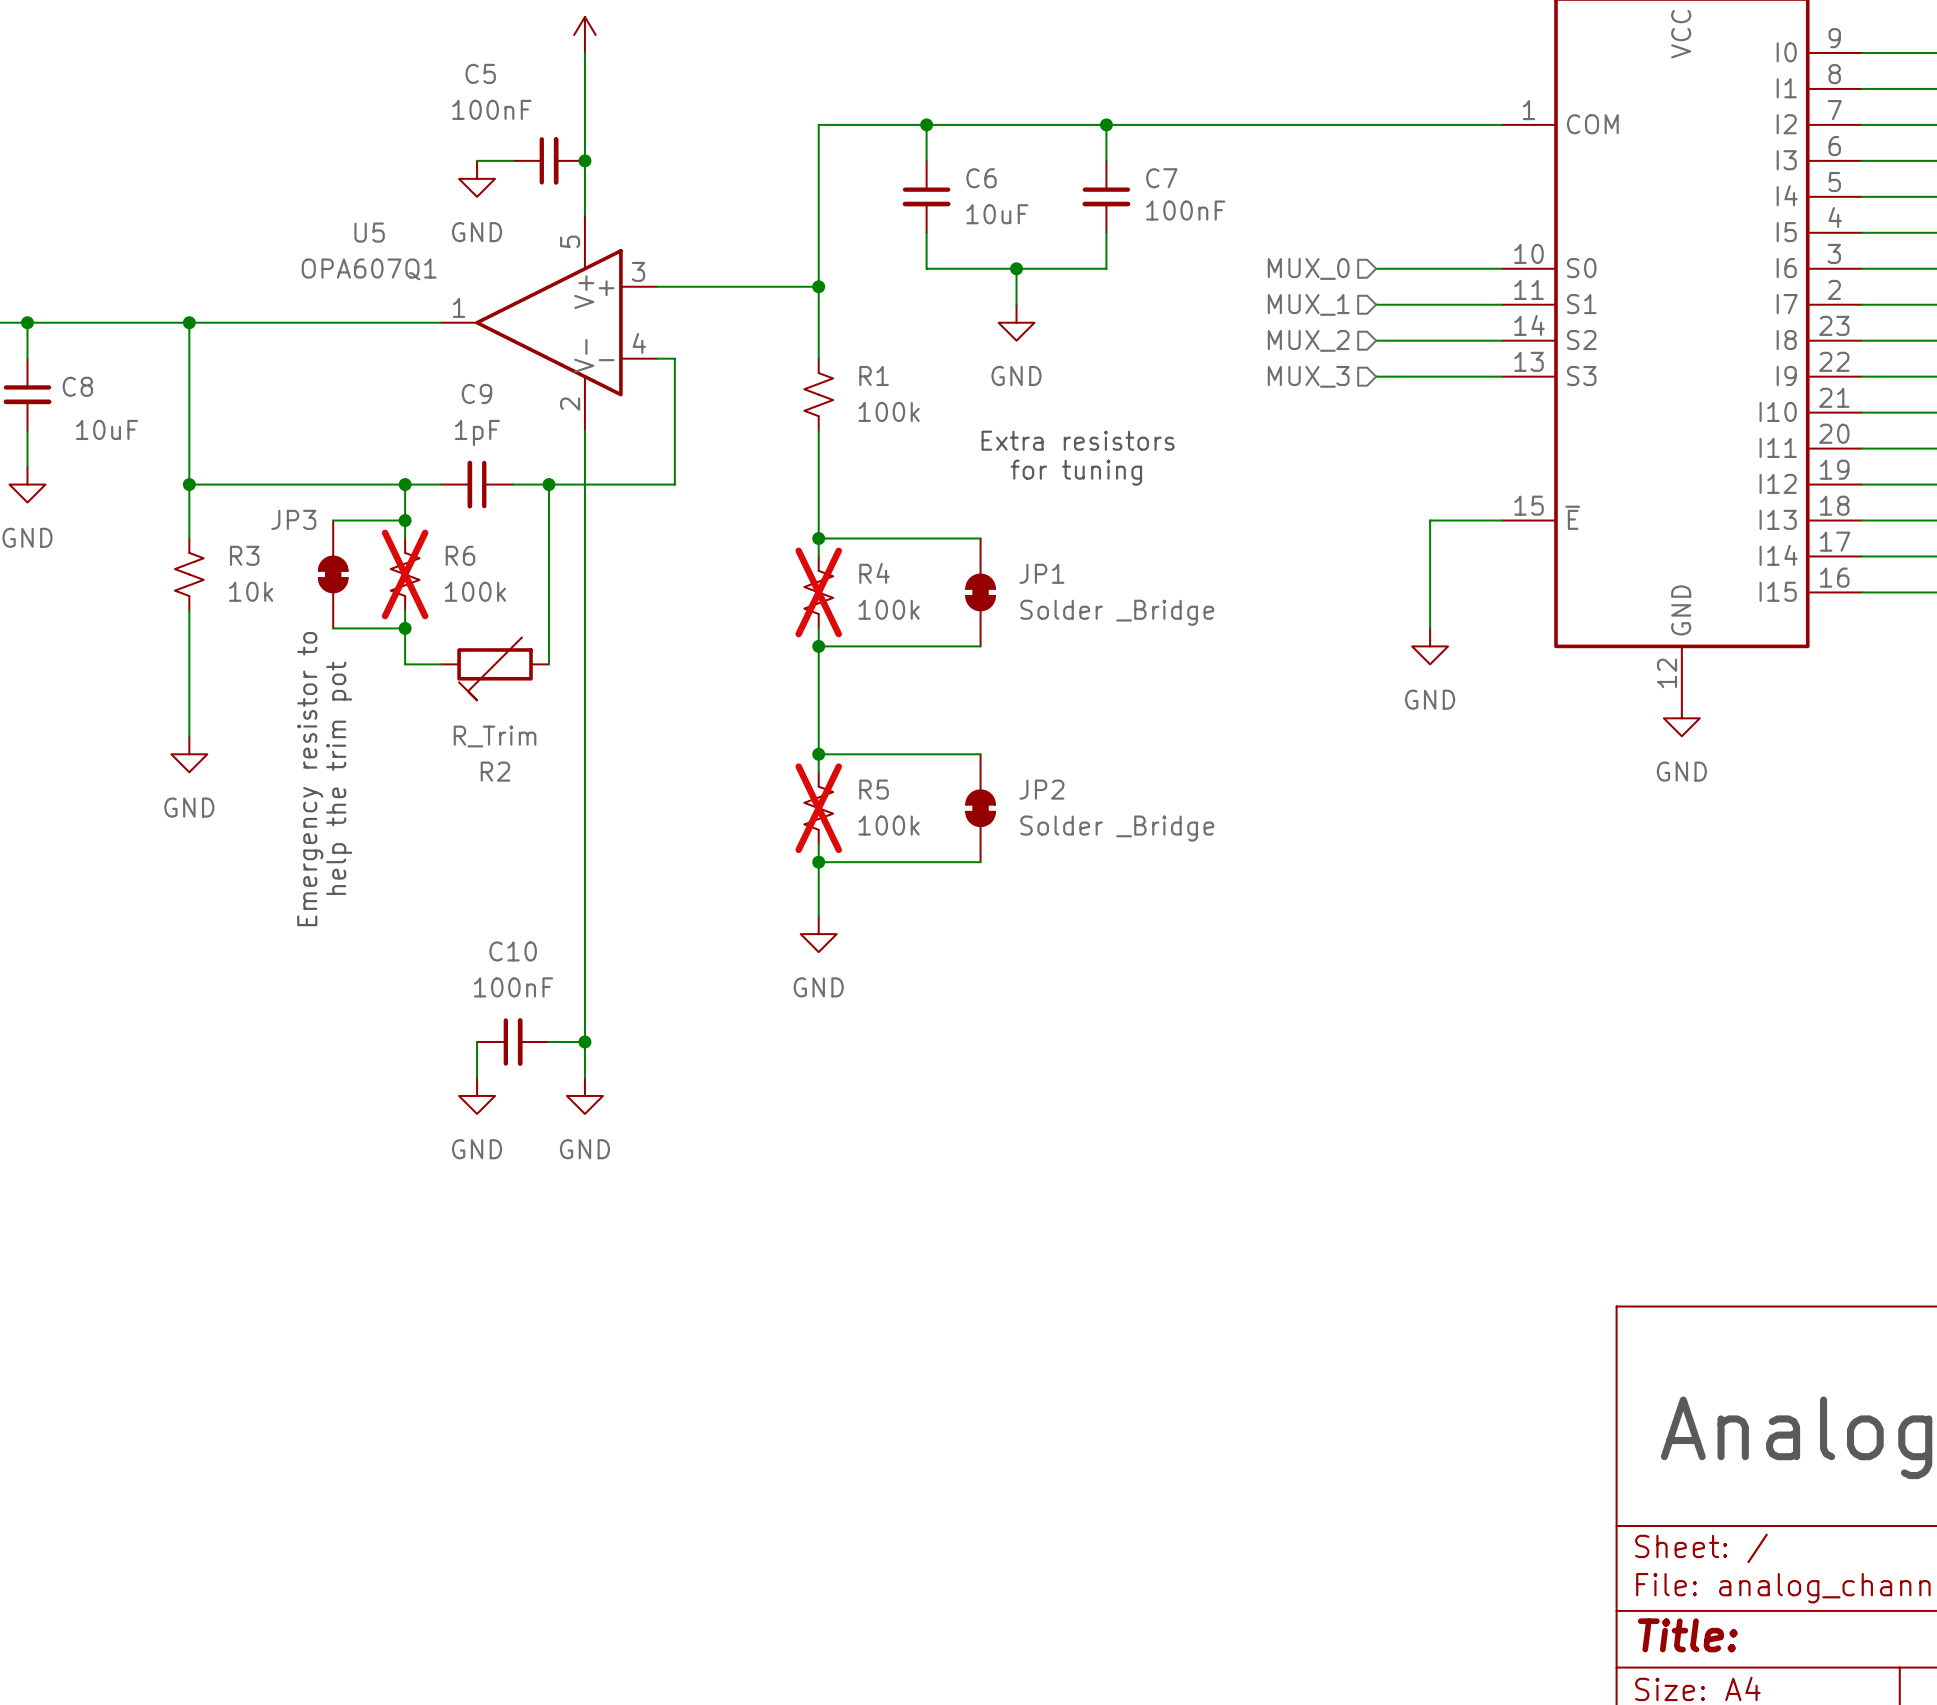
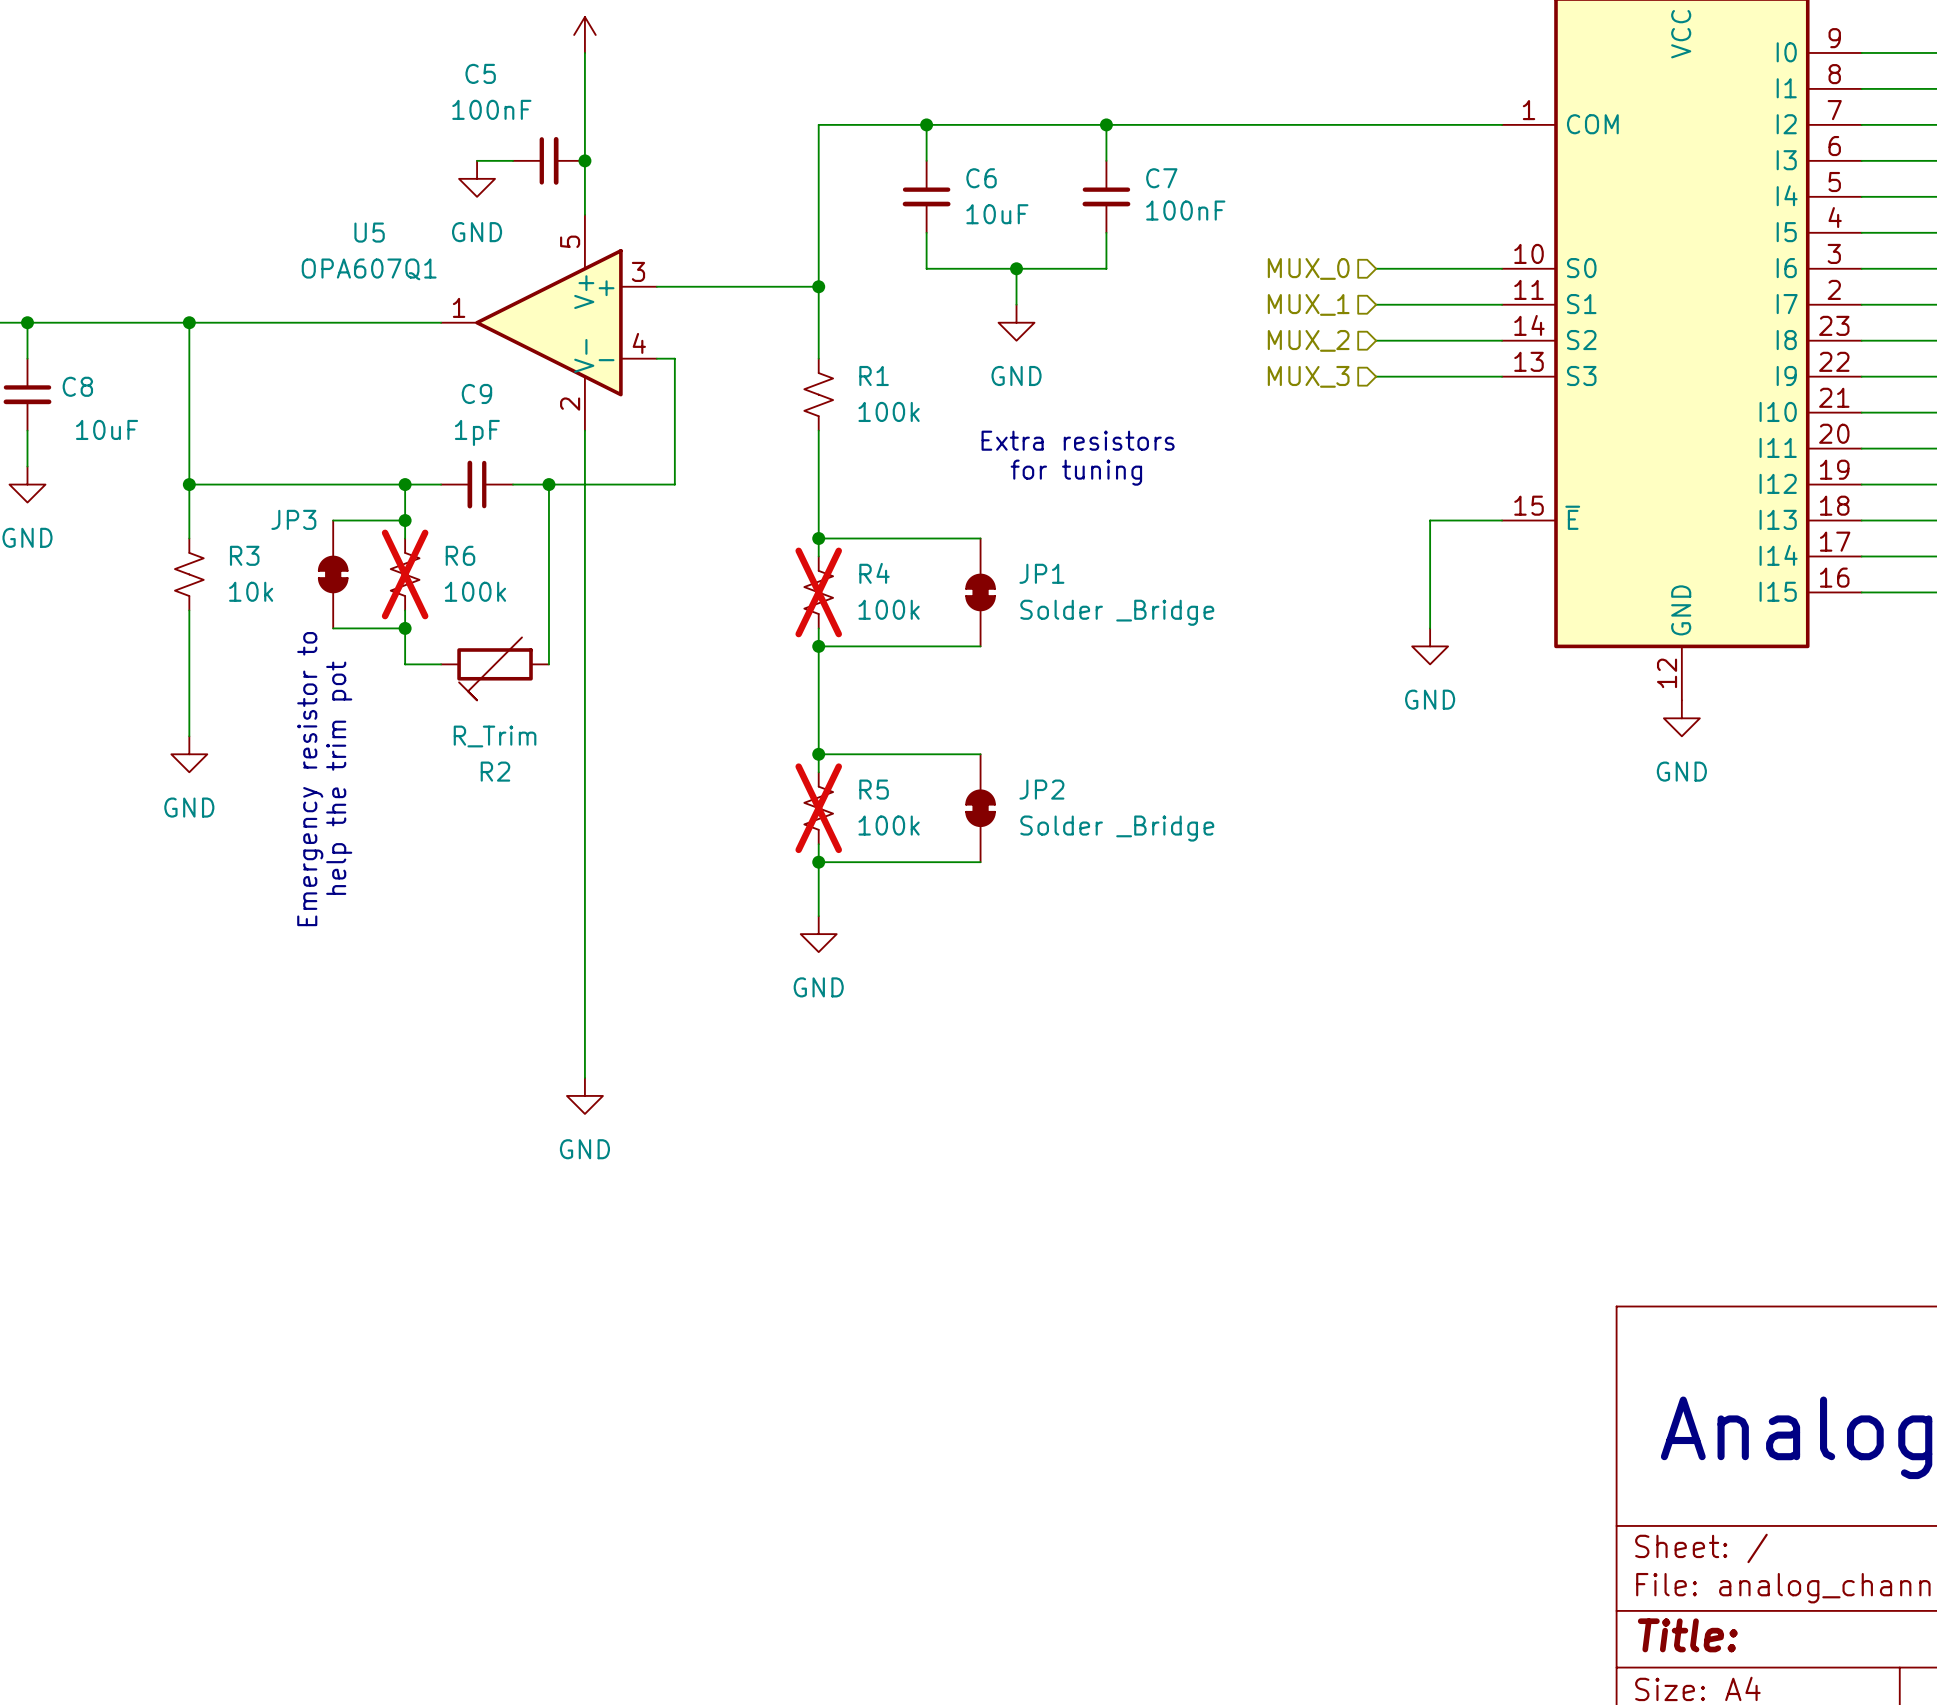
wire: (477, 1042) (477, 1077) -> none
C10: 100nF (513, 1042) -> none
wire: (548, 1042) (584, 1042) -> none
junction: (584, 1042) -> none
power symbol: GND (477, 1095) -> none

